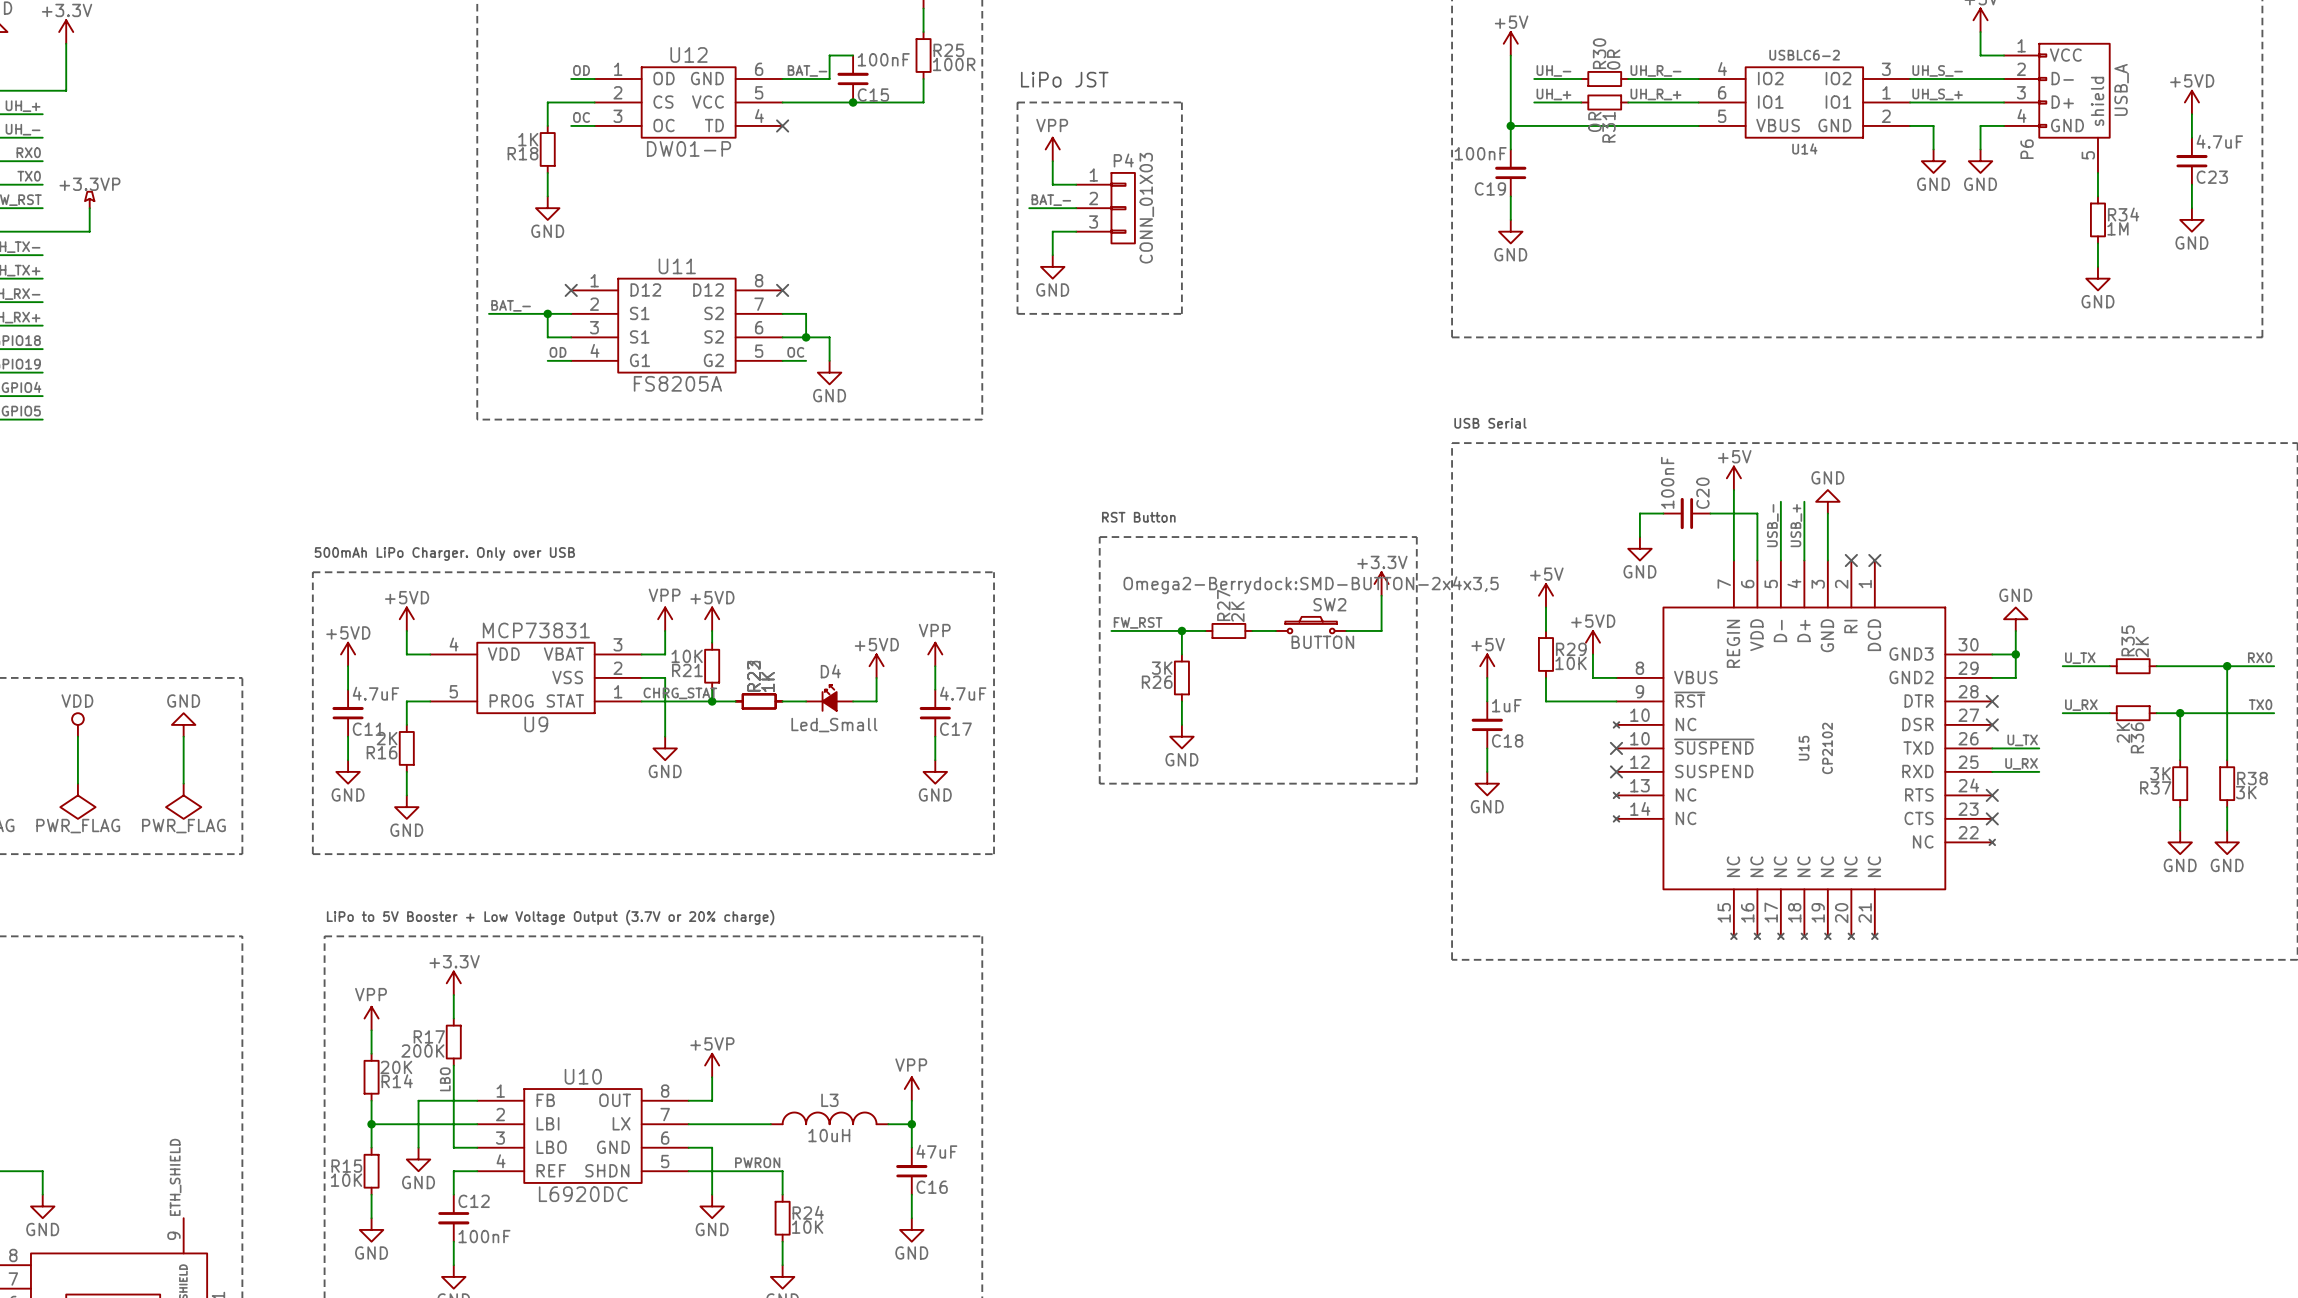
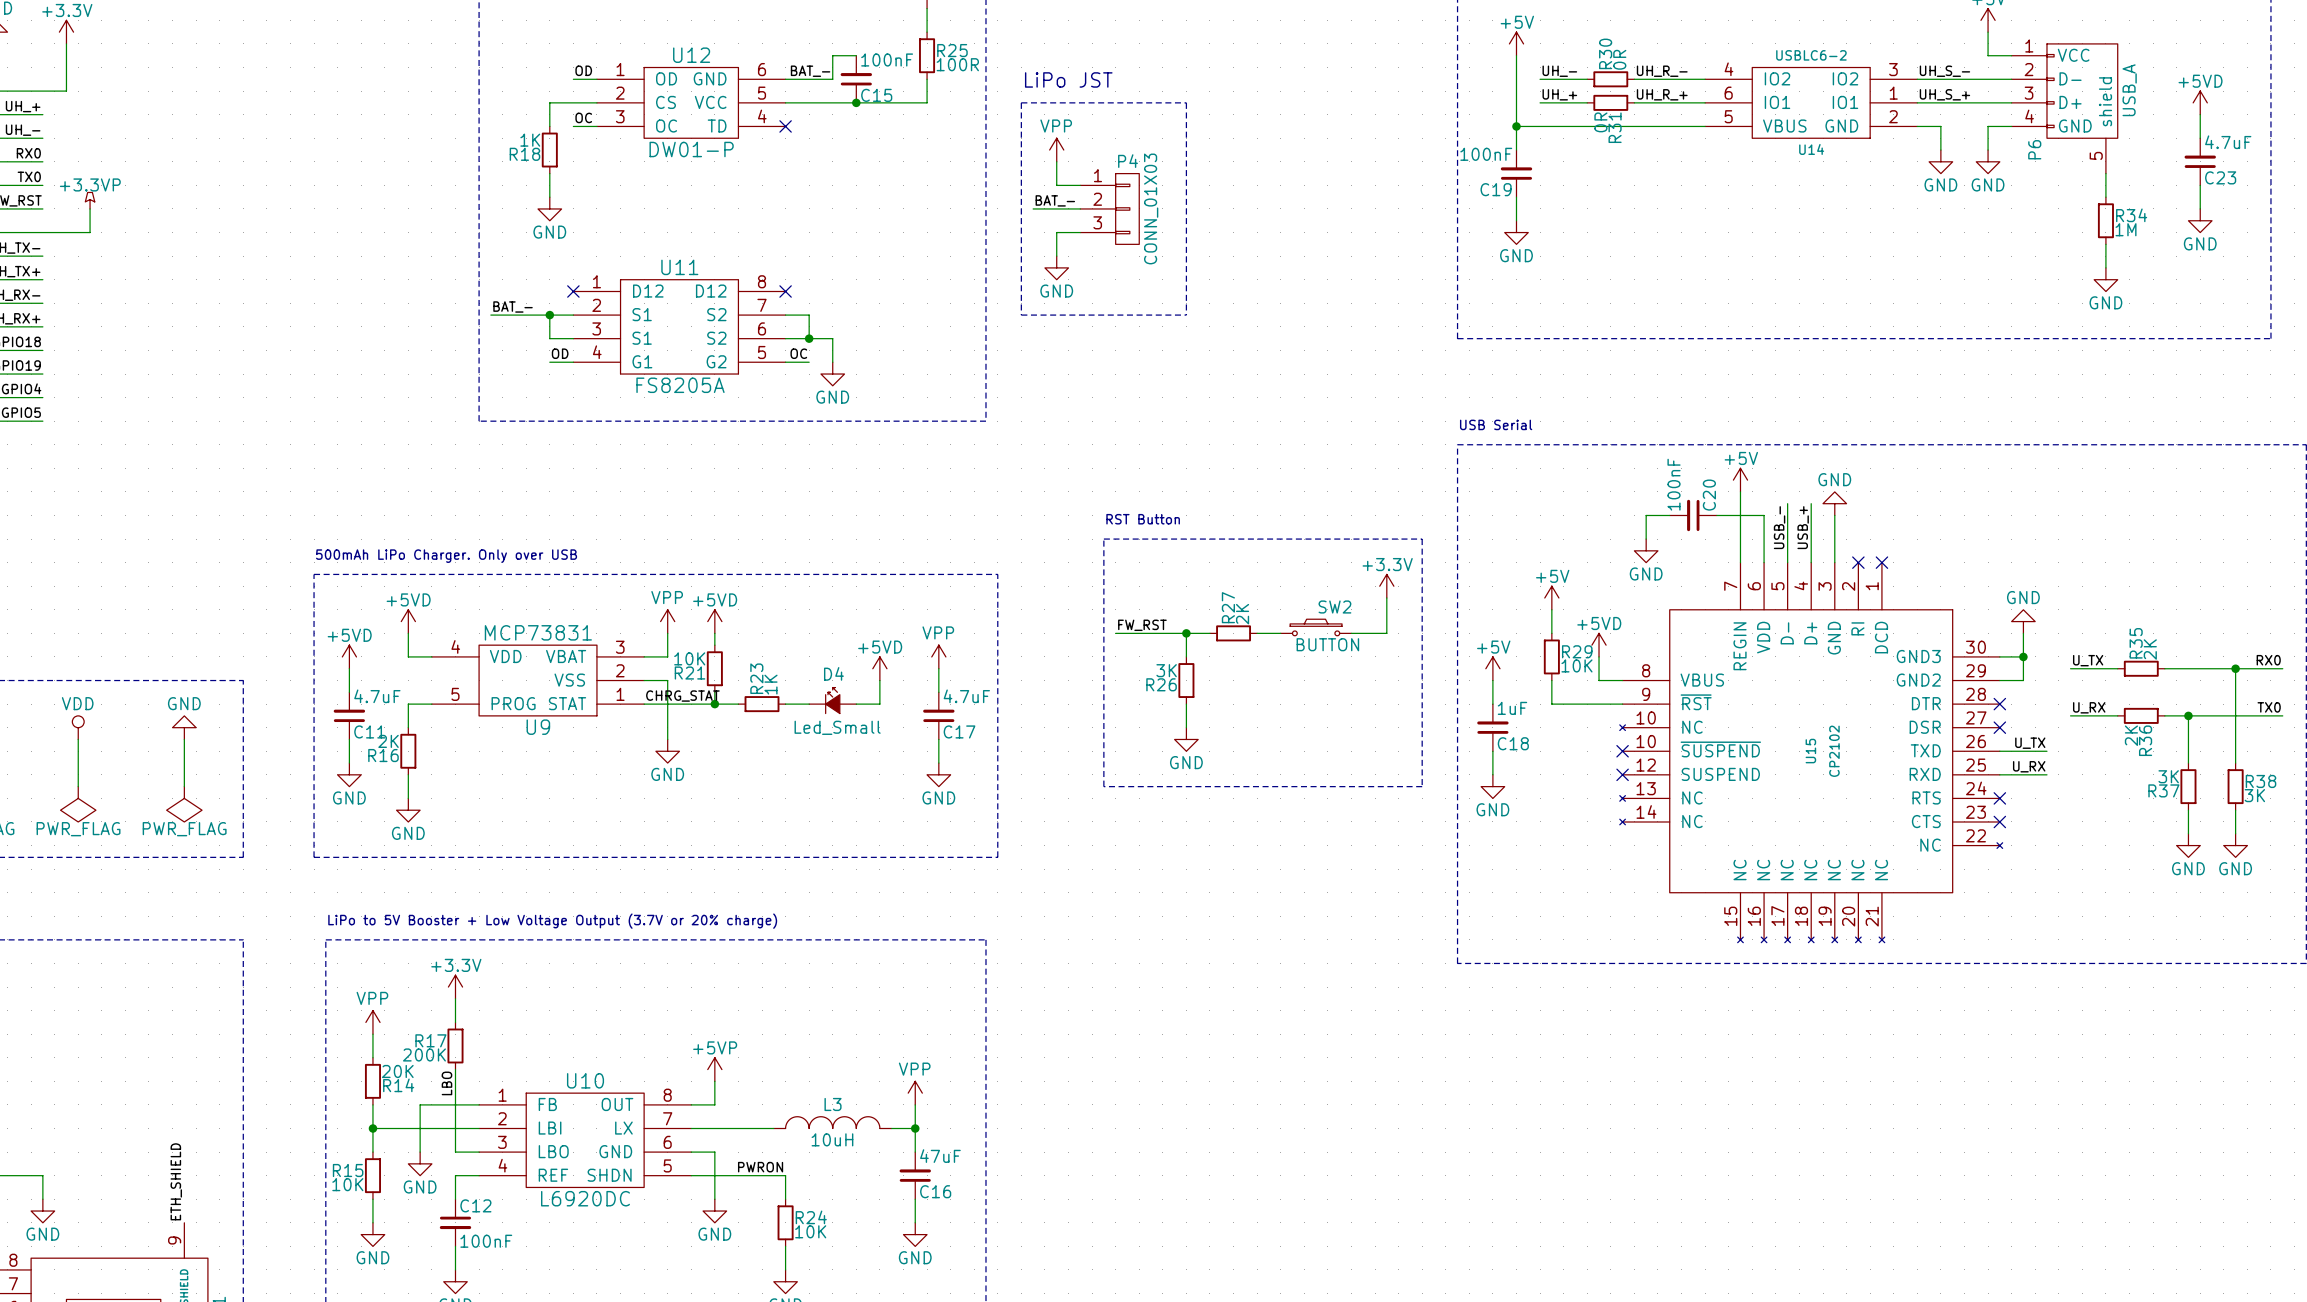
SW2 text: Omega2-Berrydock:SMD-BUTTON-2x4x3,5 (1311, 585) -> none
part: 1K (759, 701) -> none

